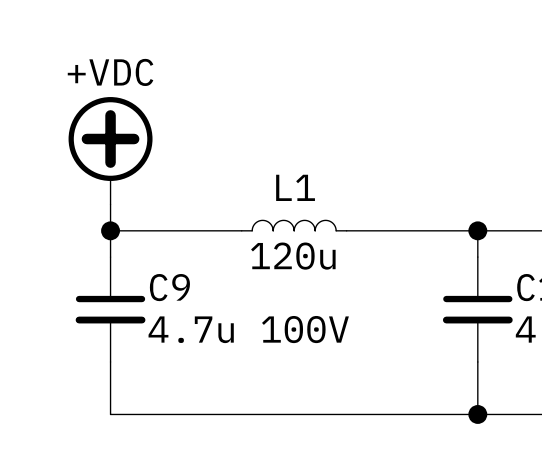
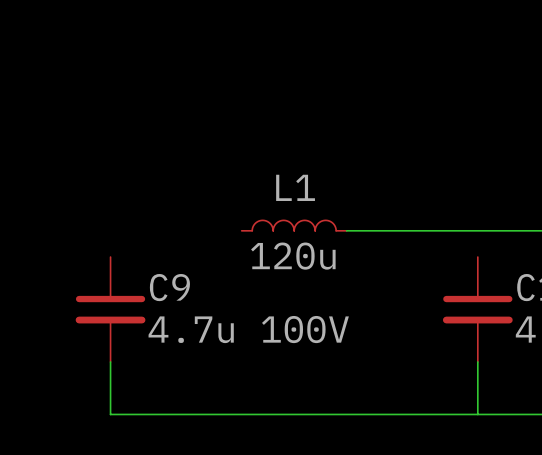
power symbol: +VDC (110, 150) -> none
wire: (110, 204) (110, 257) -> none
wire: (110, 230) (241, 230) -> none
junction: (110, 230) -> none
wire: (477, 230) (477, 257) -> none
junction: (477, 230) -> none
junction: (477, 414) -> none

